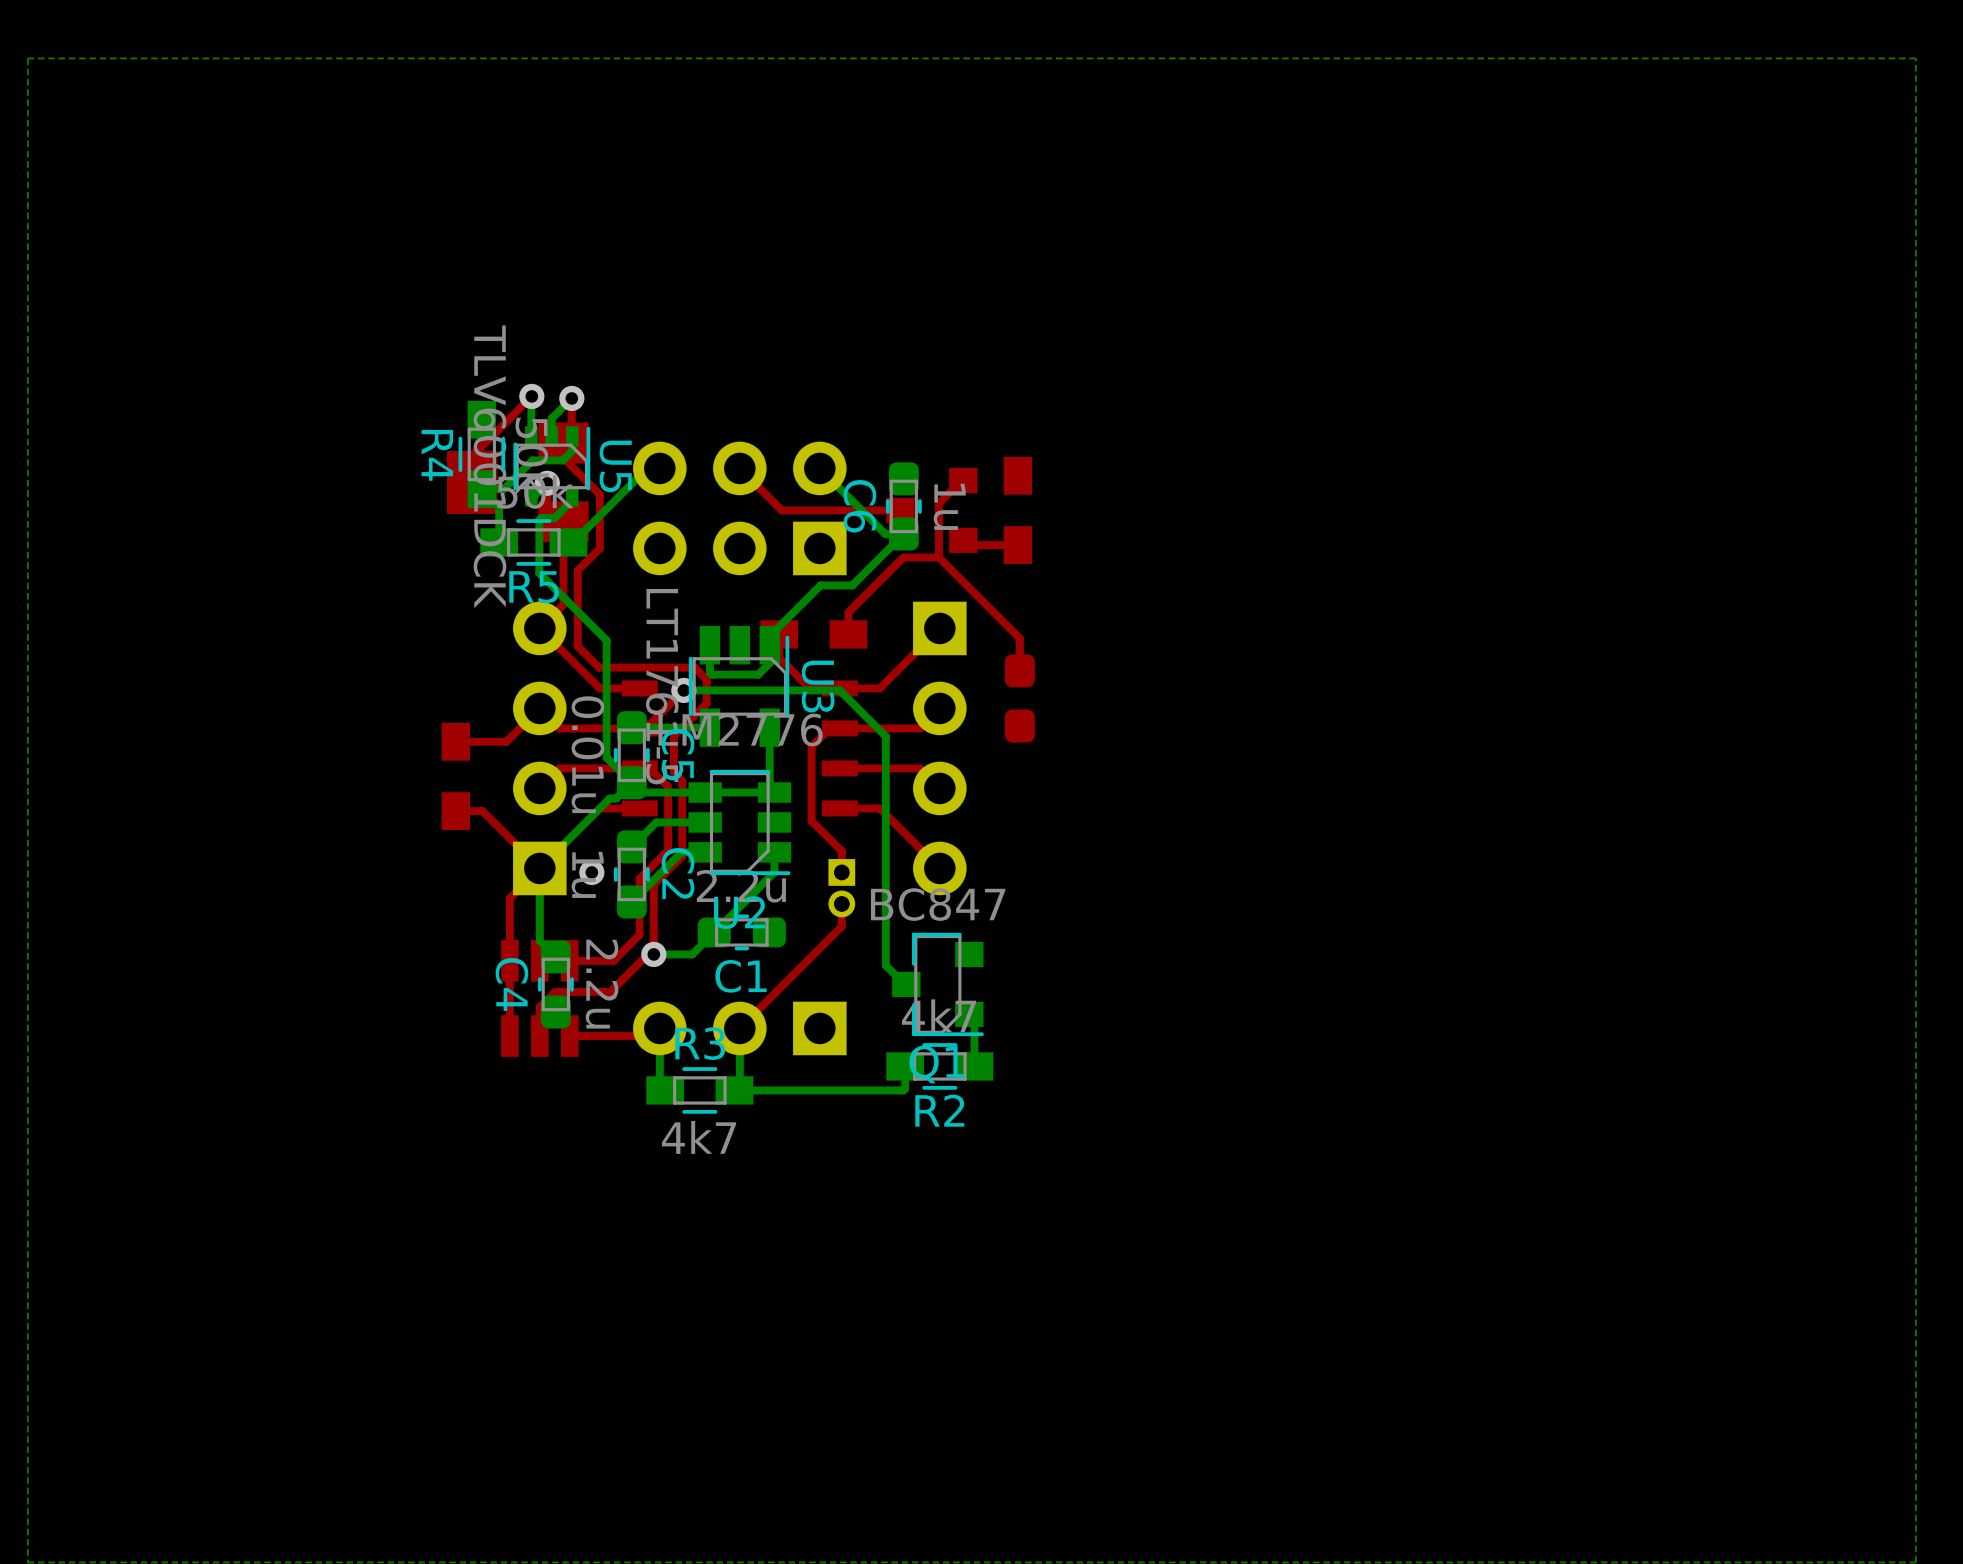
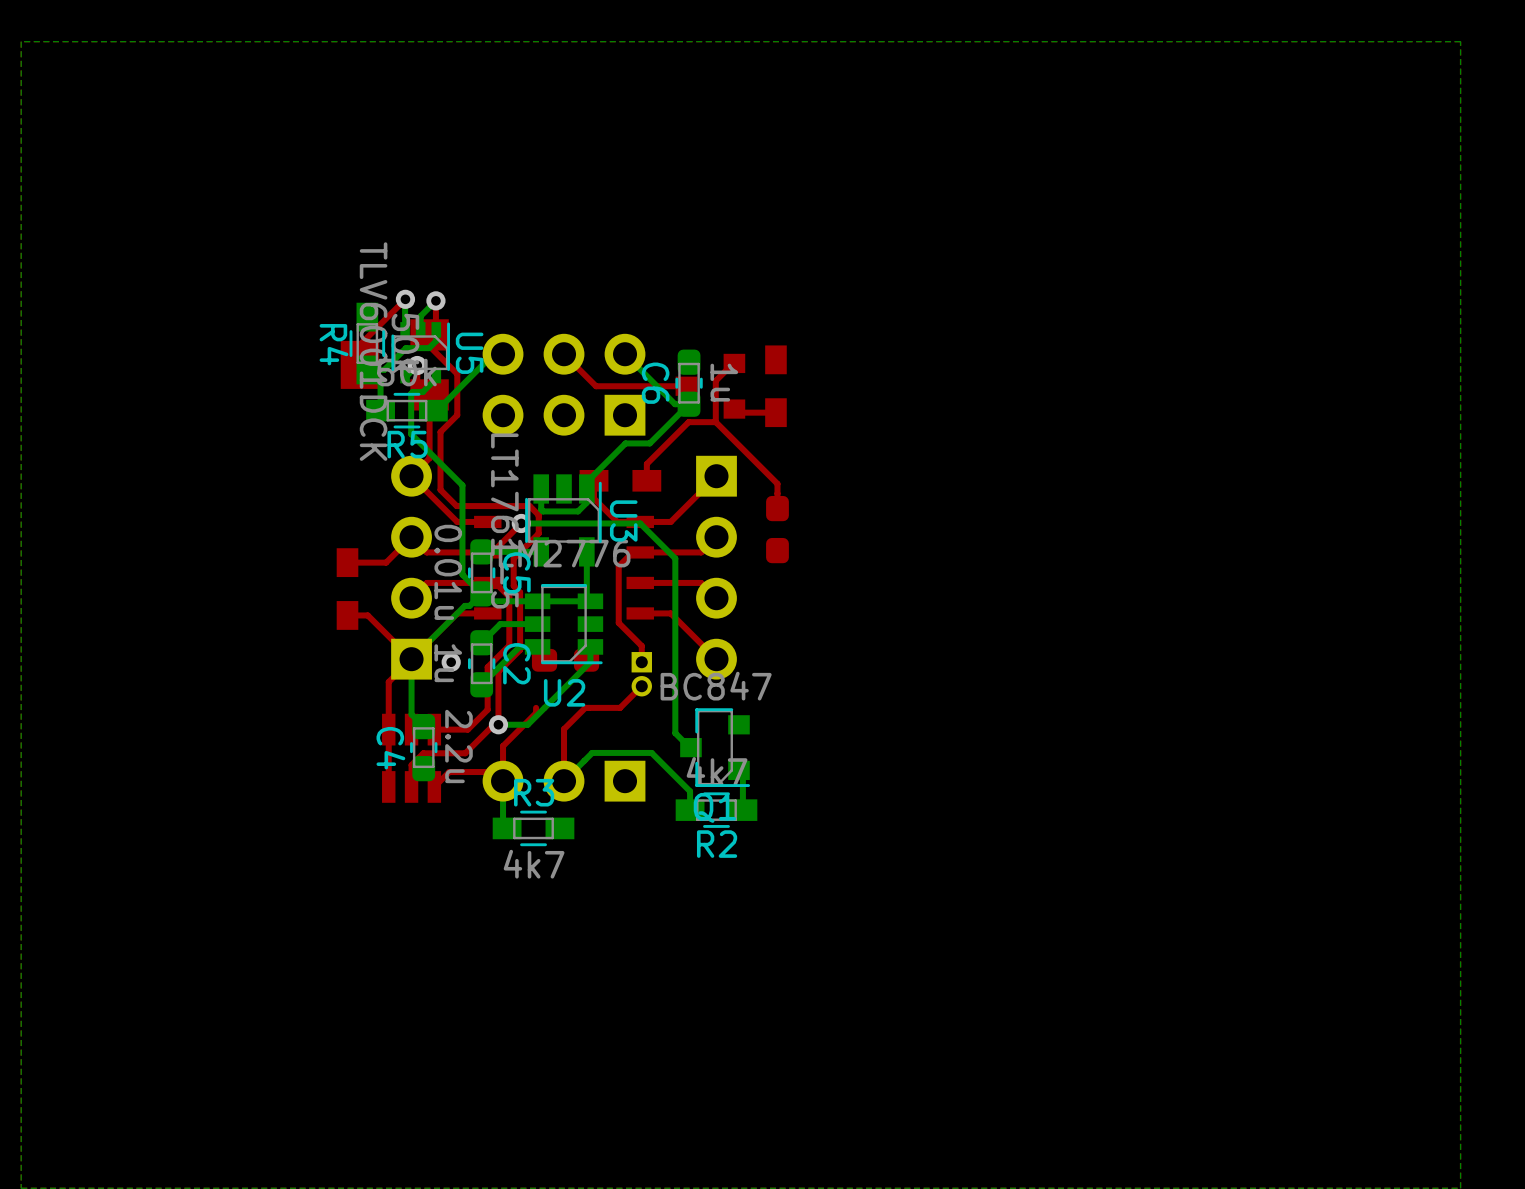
top track: (841, 903) (841, 926) (739, 1028) -> (641, 686) (620, 707) (585, 707) (564, 729) (564, 781)
C1 side: bottom (741, 932) -> top (565, 660)
top track: (659, 1028) (652, 1036) (569, 1036) -> (536, 707) (536, 713) (503, 746) (503, 781) (493, 772) (449, 772) (434, 786)
bottom track: (739, 1028) (739, 1085) (734, 1090) (903, 1090) (905, 1088) (905, 1066) -> (564, 781) (592, 752) (651, 752) (690, 791) (690, 810)

